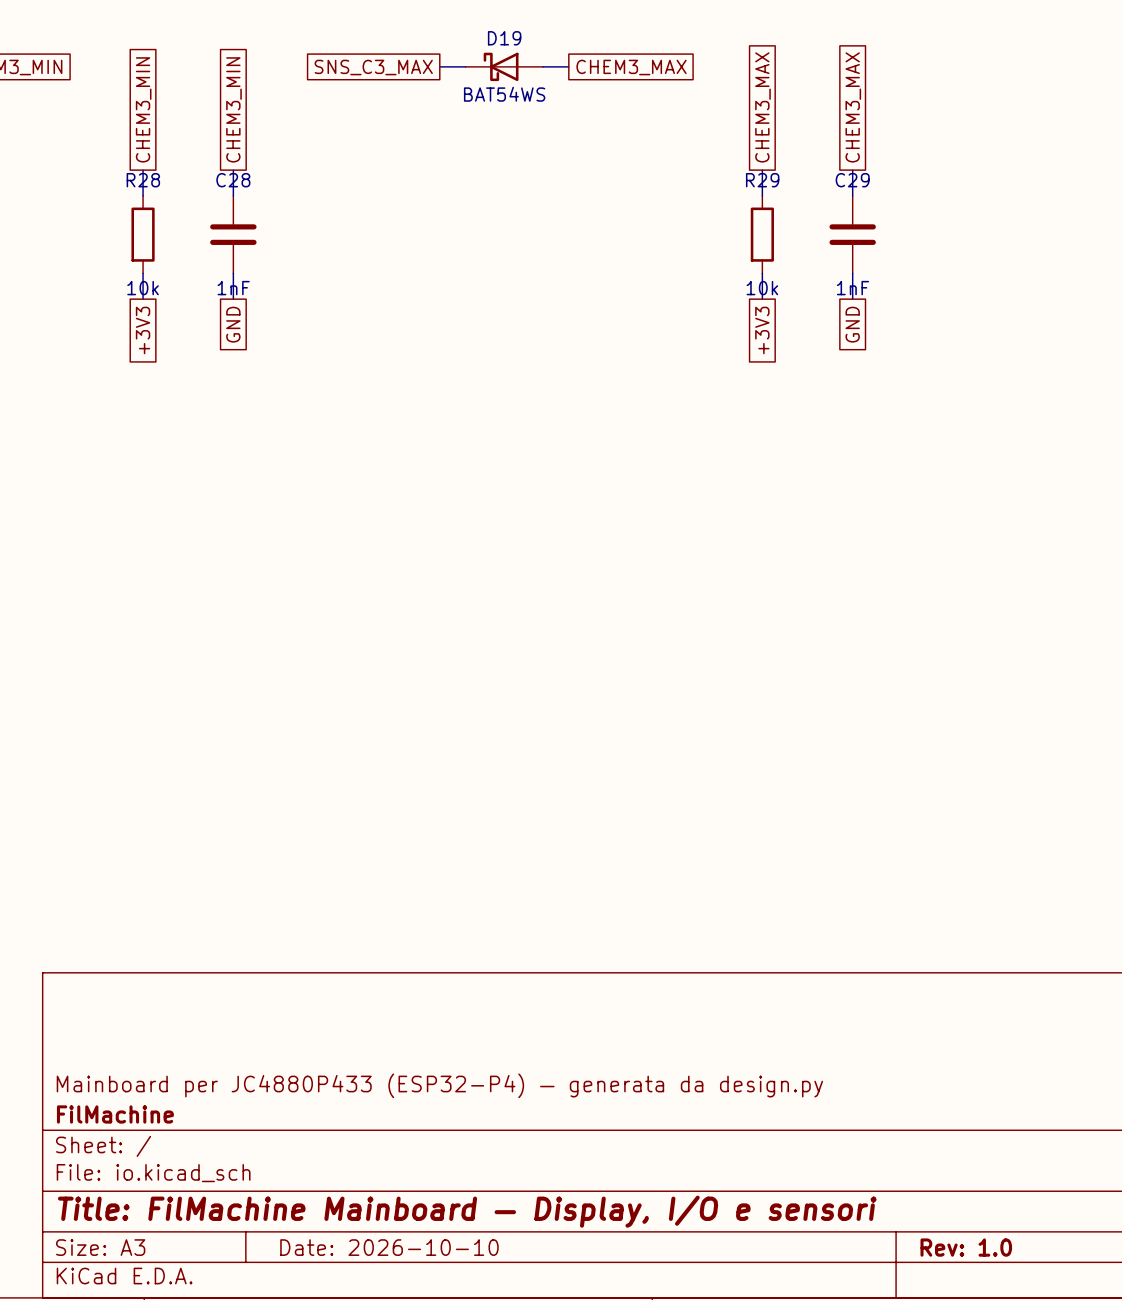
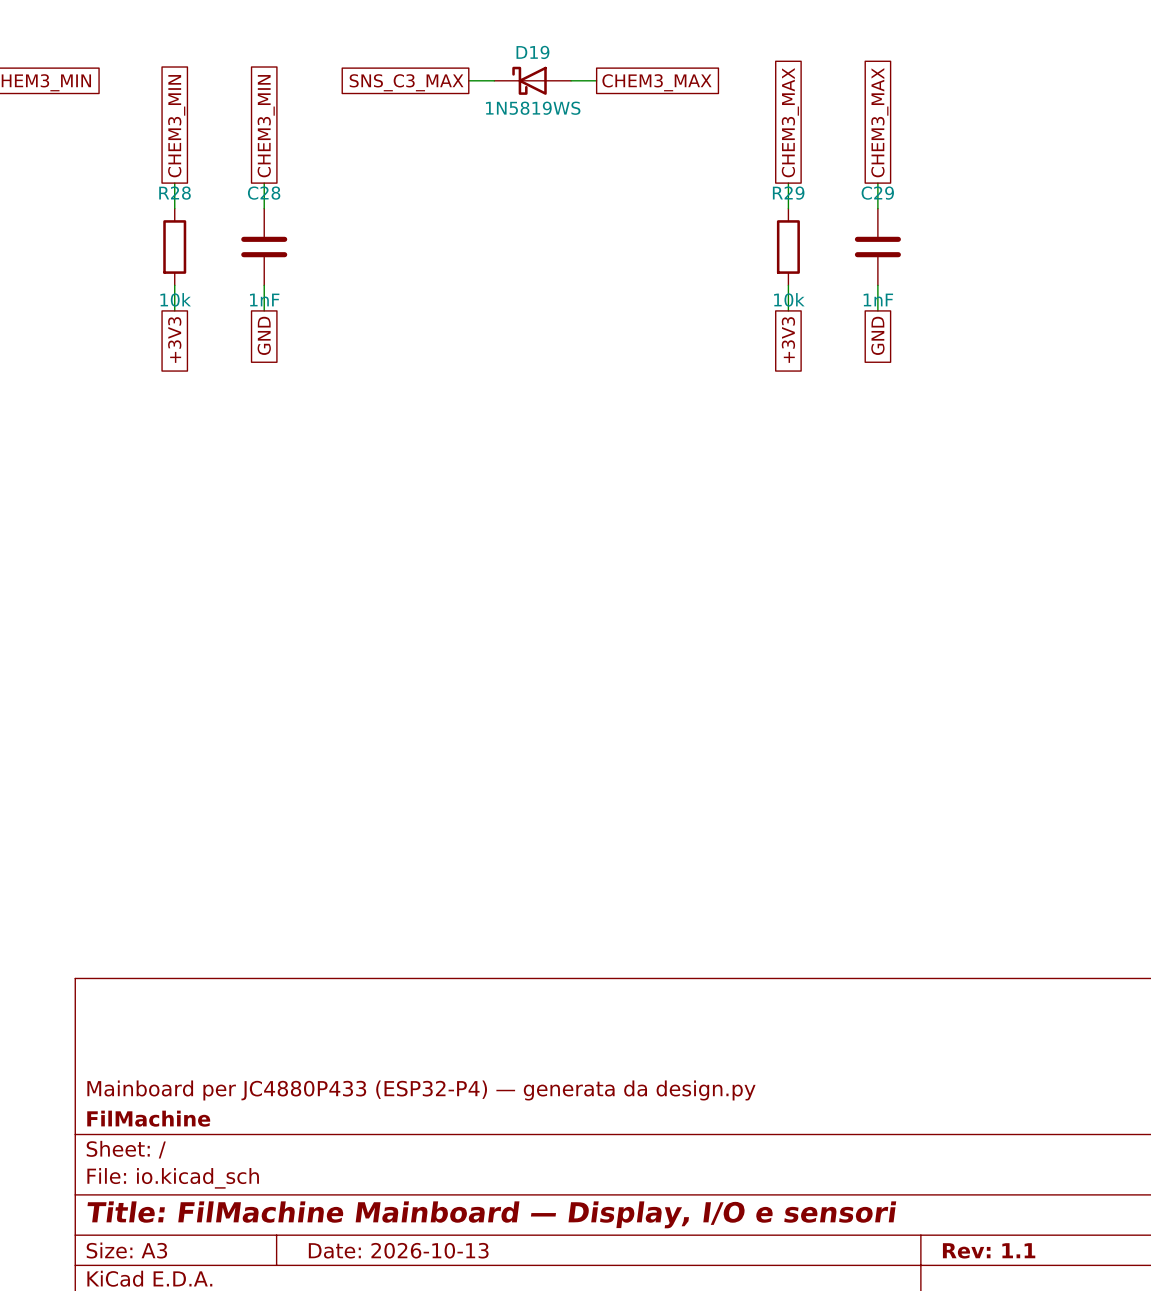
D19 value: BAT54WS (504, 94) -> 1N5819WS (533, 108)
title block: Date: 2026-10-10 (389, 1247) -> Date: 2026-10-13 (398, 1250)
title block: Rev: 1.0 (966, 1247) -> Rev: 1.1 (989, 1250)

